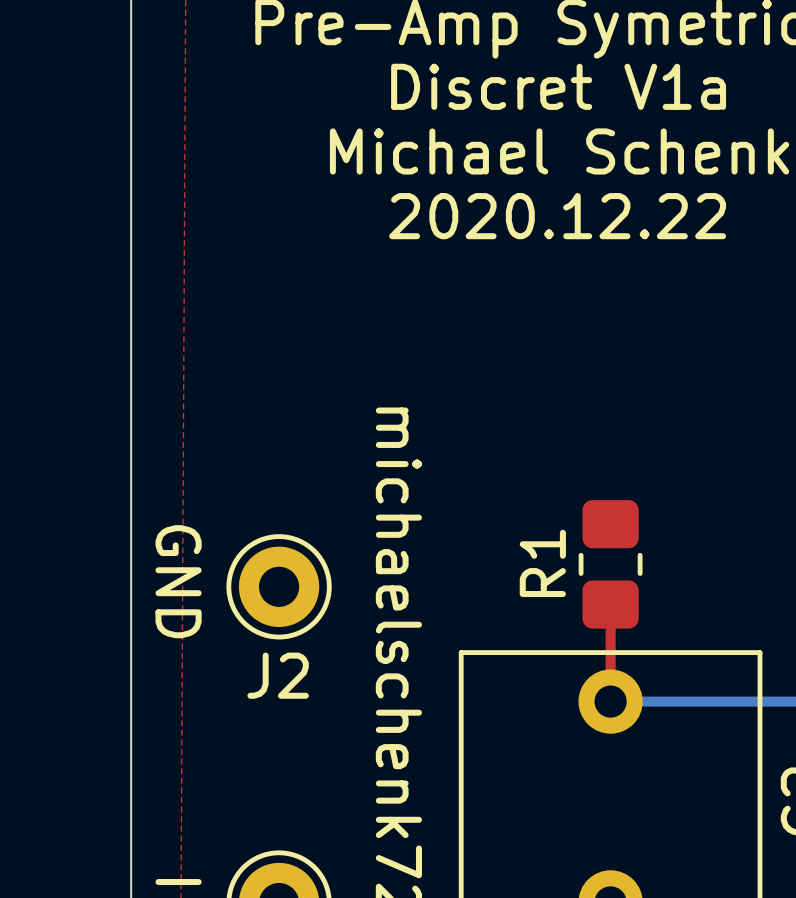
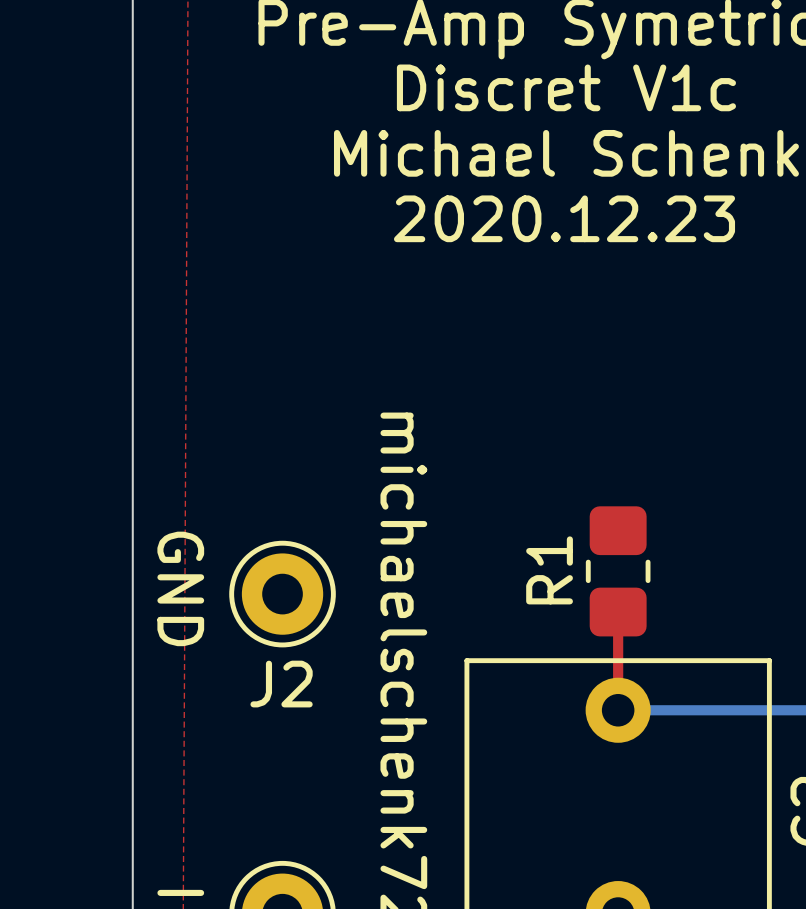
text: Discret V1a (558, 86) -> Discret V1c (566, 87)
text: 2020.12.22 (557, 216) -> 2020.12.23 (564, 218)

